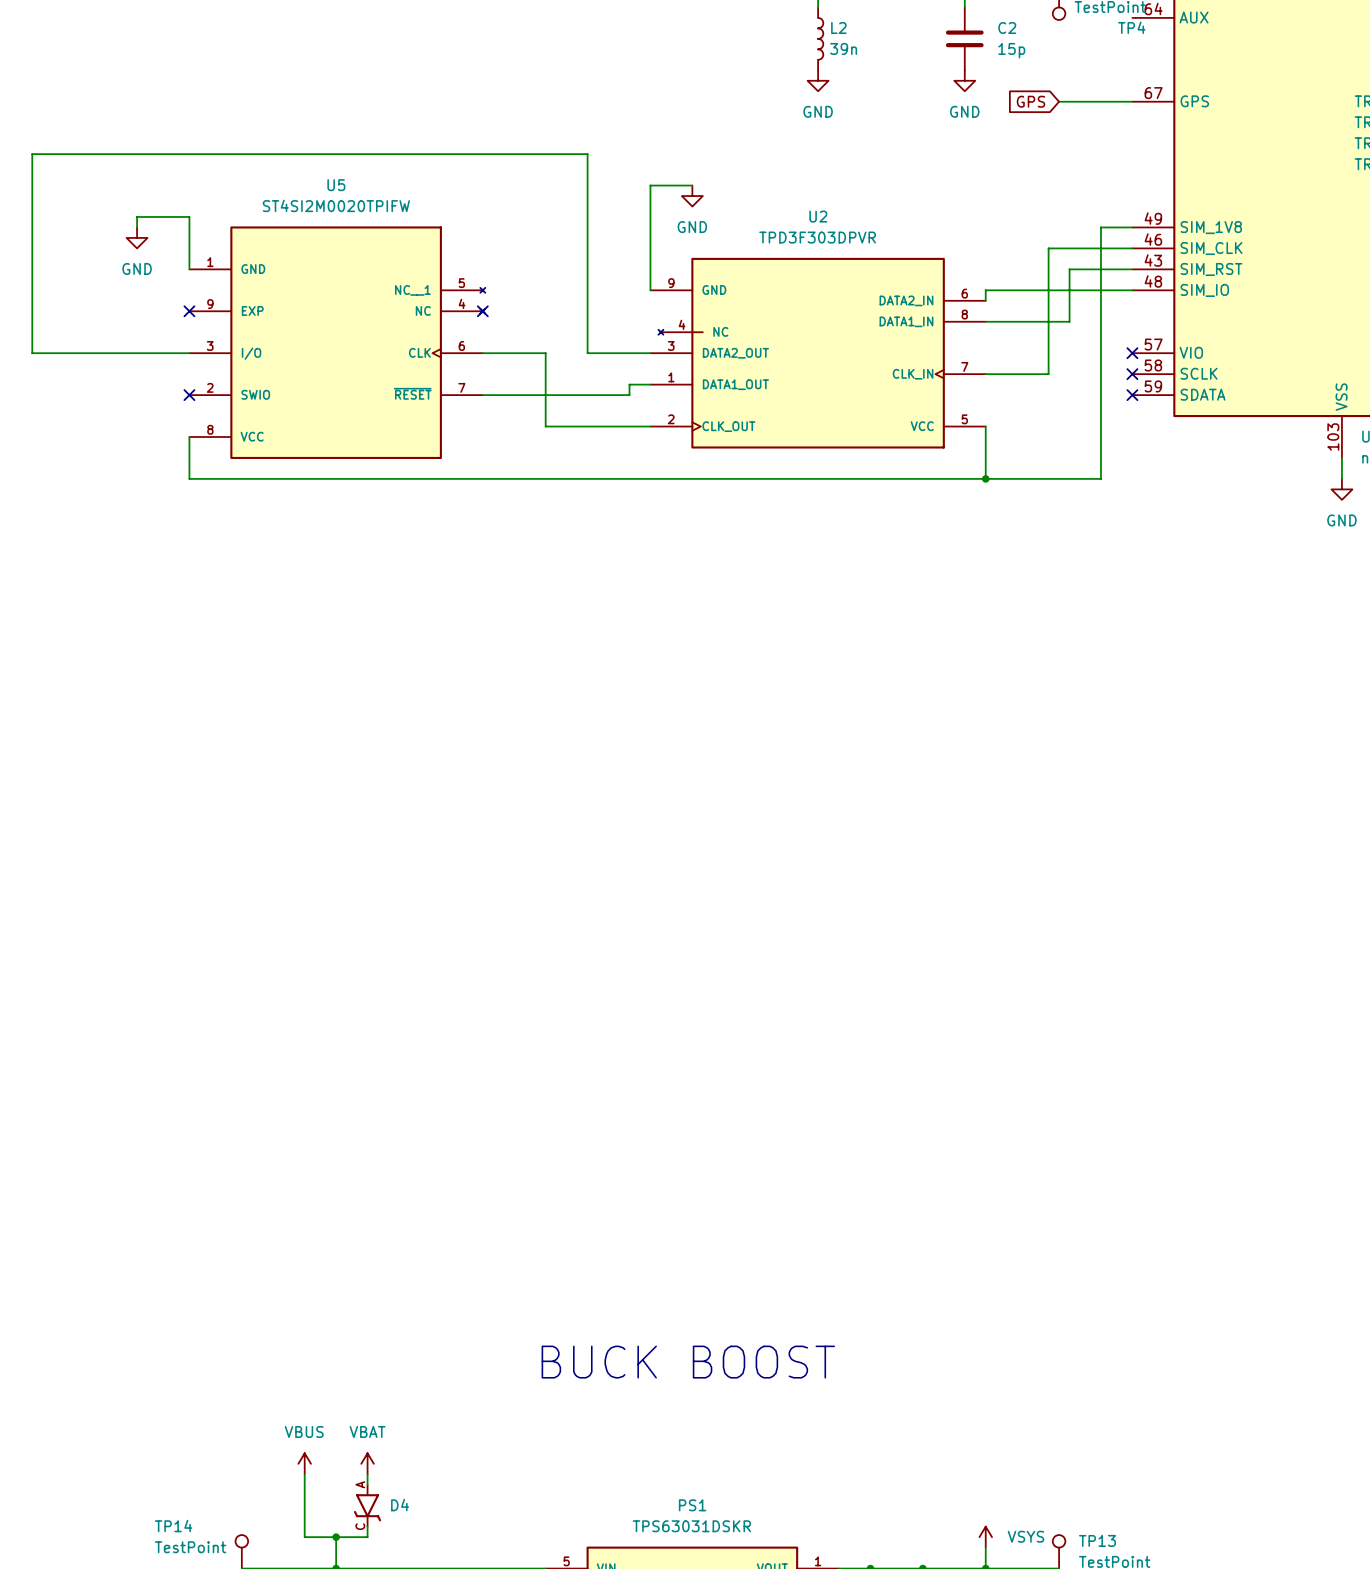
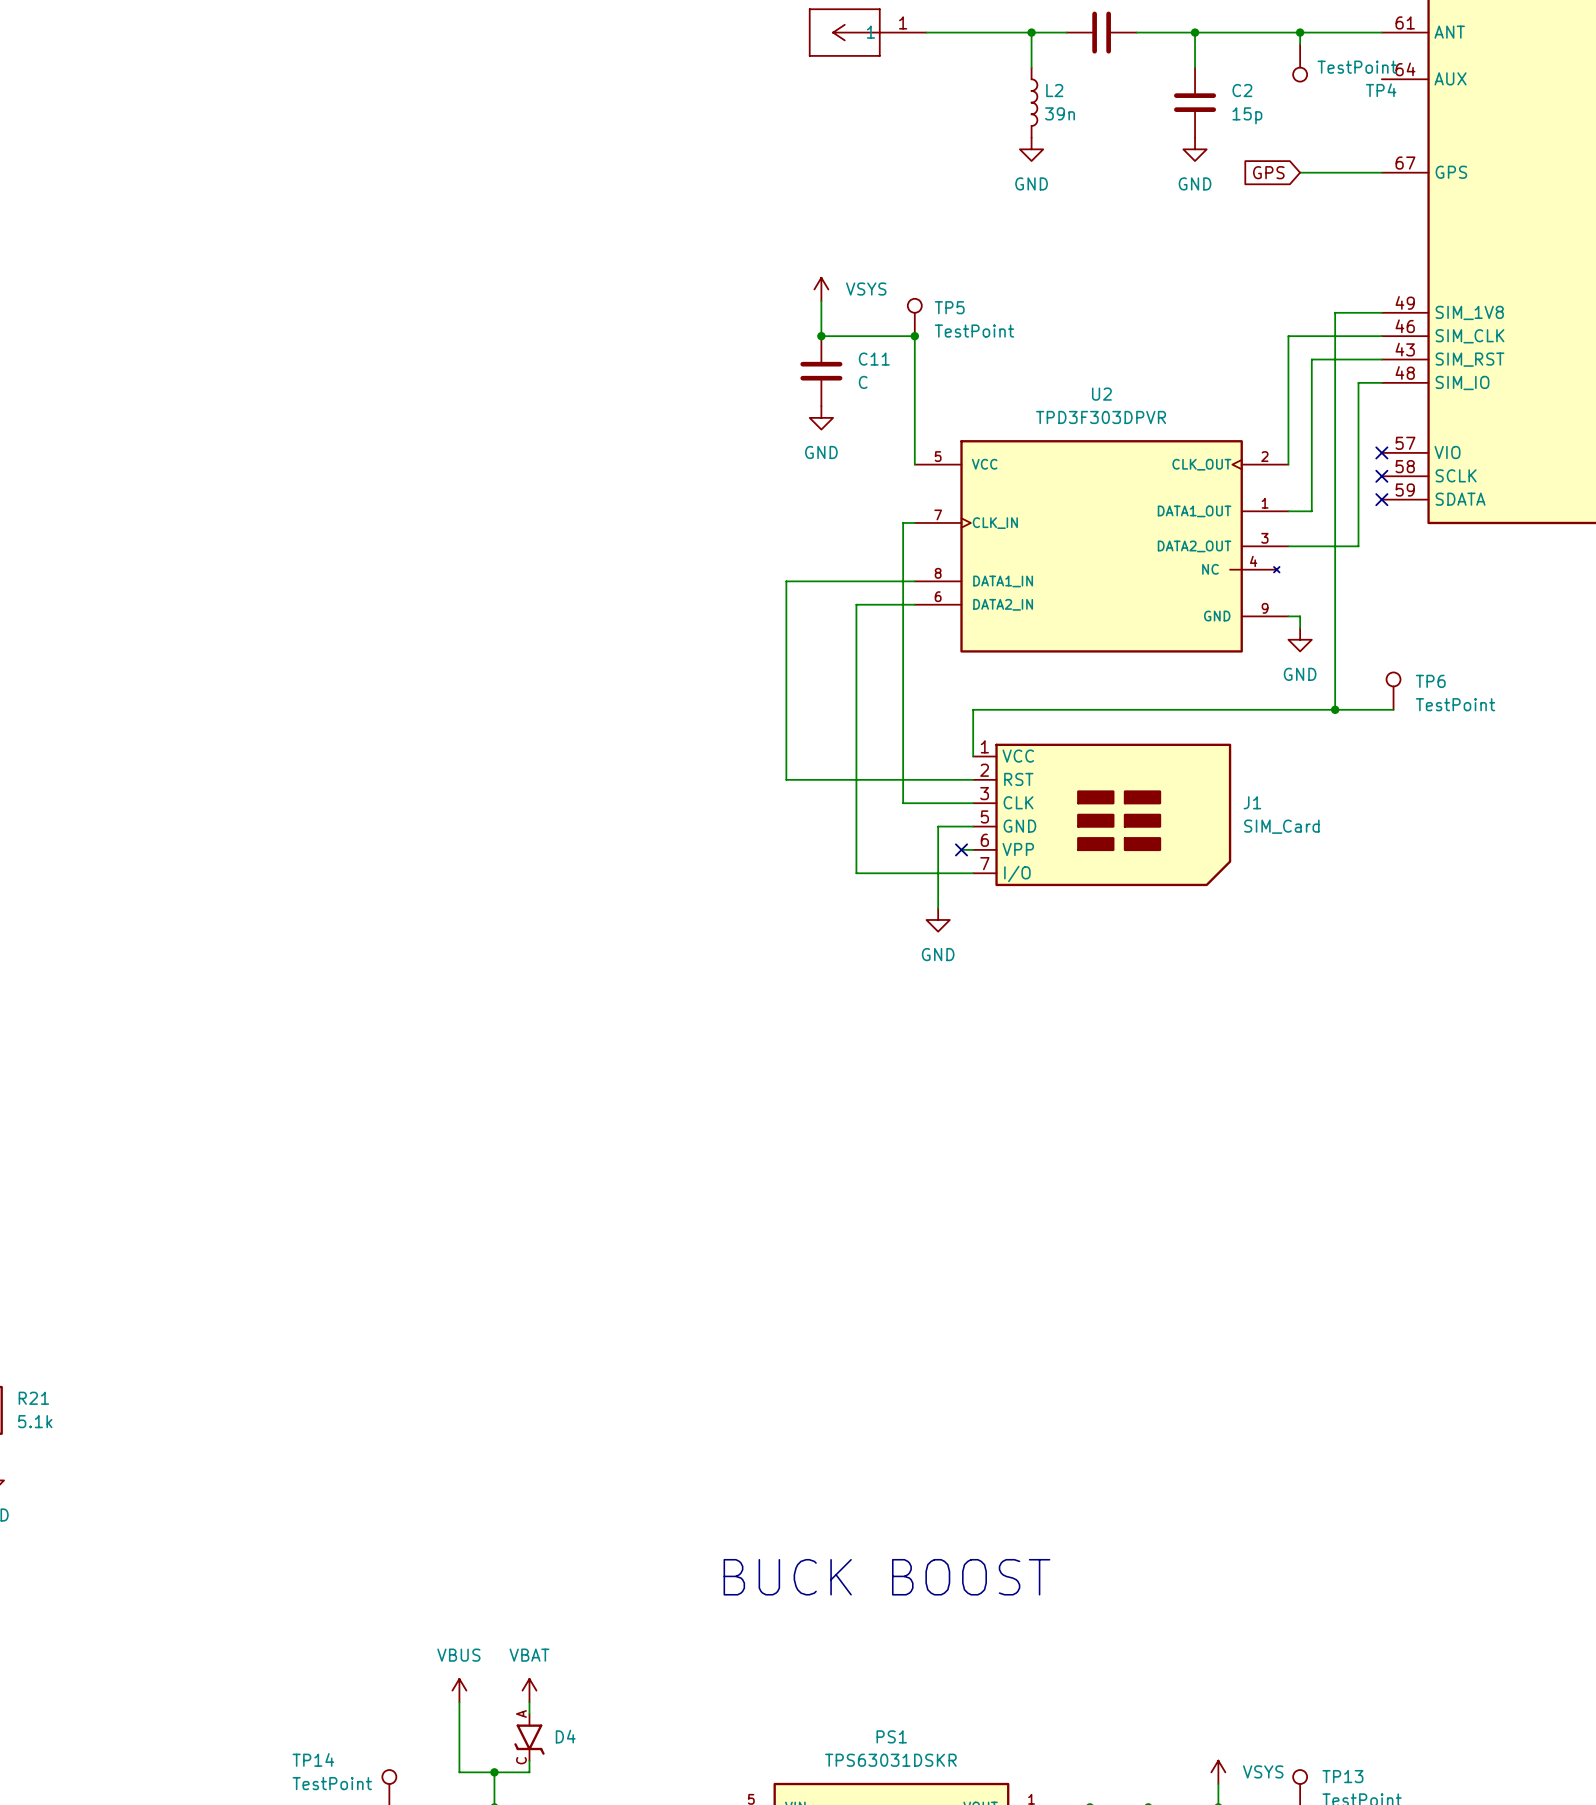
wire: (692, 185) (650, 185) (650, 290) -> none
power symbol position: GND (692, 196) -> GND (821, 417)
power symbol: none -> VSYS (821, 289)
wire: none -> (821, 301) (821, 336) (914, 336) (914, 464)
wire: (137, 227) (137, 216) (189, 216) (189, 269) -> none
wire: (1100, 227) (1100, 478) (189, 478) (189, 437) -> (1346, 312) (1335, 312) (1335, 709)
TP5: none -> TestPoint (914, 317)
power symbol: GND (137, 237) -> none
junction: none -> (821, 336)
junction: none -> (914, 336)
C11: none -> C (821, 371)
wire: (1111, 290) (985, 290) (985, 300) -> (1358, 382) (1358, 546) (1288, 546)
no-connect mark: (189, 311) -> none
no-connect mark: (482, 311) -> none
wire: (985, 321) (1069, 321) -> (1288, 511) (1311, 511) (1311, 417)
U5: ST4SI2M0020TPIFW (337, 342) -> none
wire: (189, 353) (32, 353) (32, 154) (587, 154) (587, 353) (650, 353) -> none
wire: (482, 353) (545, 353) (545, 426) (650, 426) -> none
U2 rotation: 0° (801, 353) -> 180° (1119, 546)
wire: (1048, 363) (1048, 374) (985, 374) -> none
wire: (650, 384) (629, 384) (629, 395) (482, 395) -> none
no-connect mark: (189, 395) -> none
wire: none -> (914, 522) (903, 522) (903, 803) (973, 803)
wire: none -> (914, 581) (786, 581) (786, 779) (973, 779)
junction: (985, 478) -> none
wire: none -> (914, 604) (856, 604) (856, 873) (973, 873)
wire: none -> (1288, 616) (1300, 616) (1300, 628)
power symbol: none -> GND (1300, 639)
TP6: none -> TestPoint (1393, 691)
junction: none -> (1335, 709)
wire: none -> (1393, 709) (973, 709) (973, 756)
J1: none -> SIM_Card (1102, 814)
wire: none -> (973, 826) (938, 826) (938, 908)
wire: none -> (961, 849) (973, 849)
no-connect mark: none -> (961, 849)
power symbol: none -> GND (938, 919)

